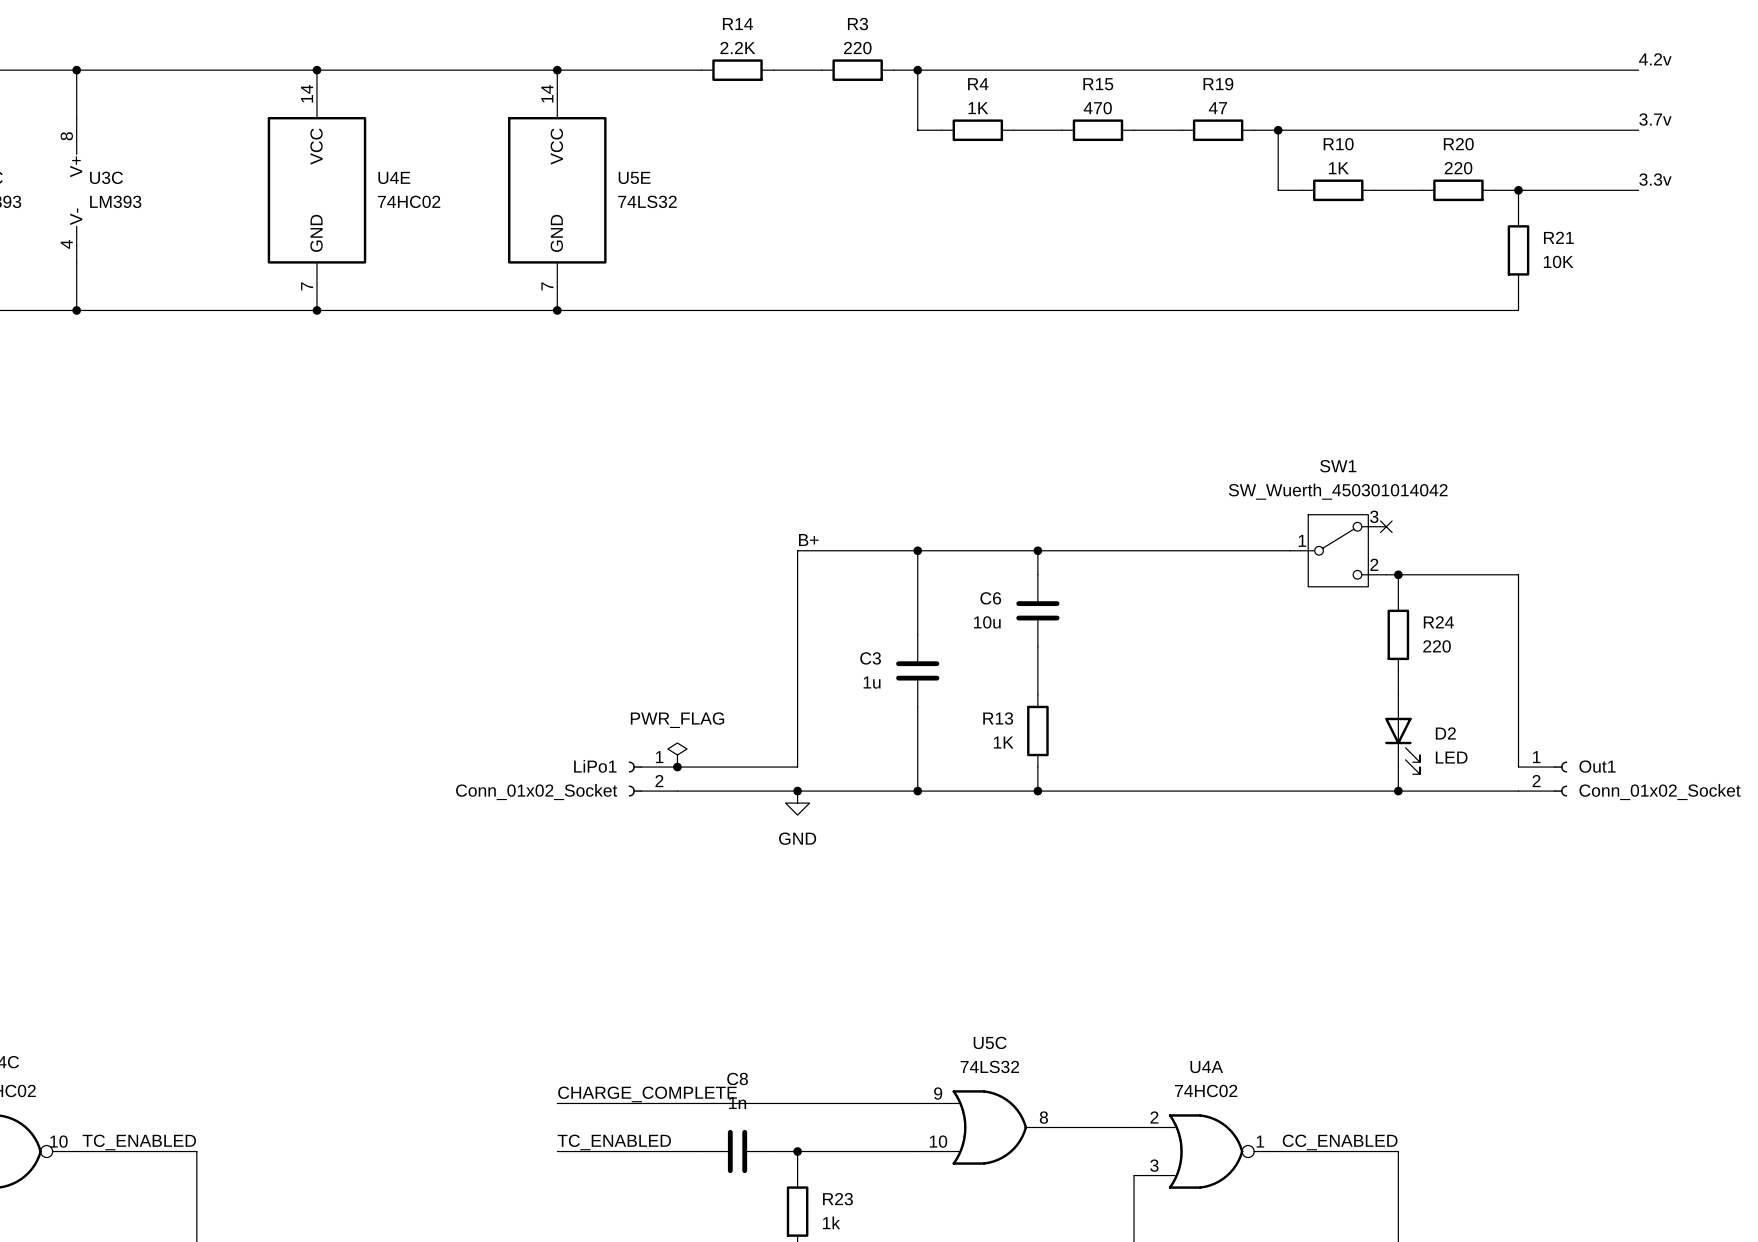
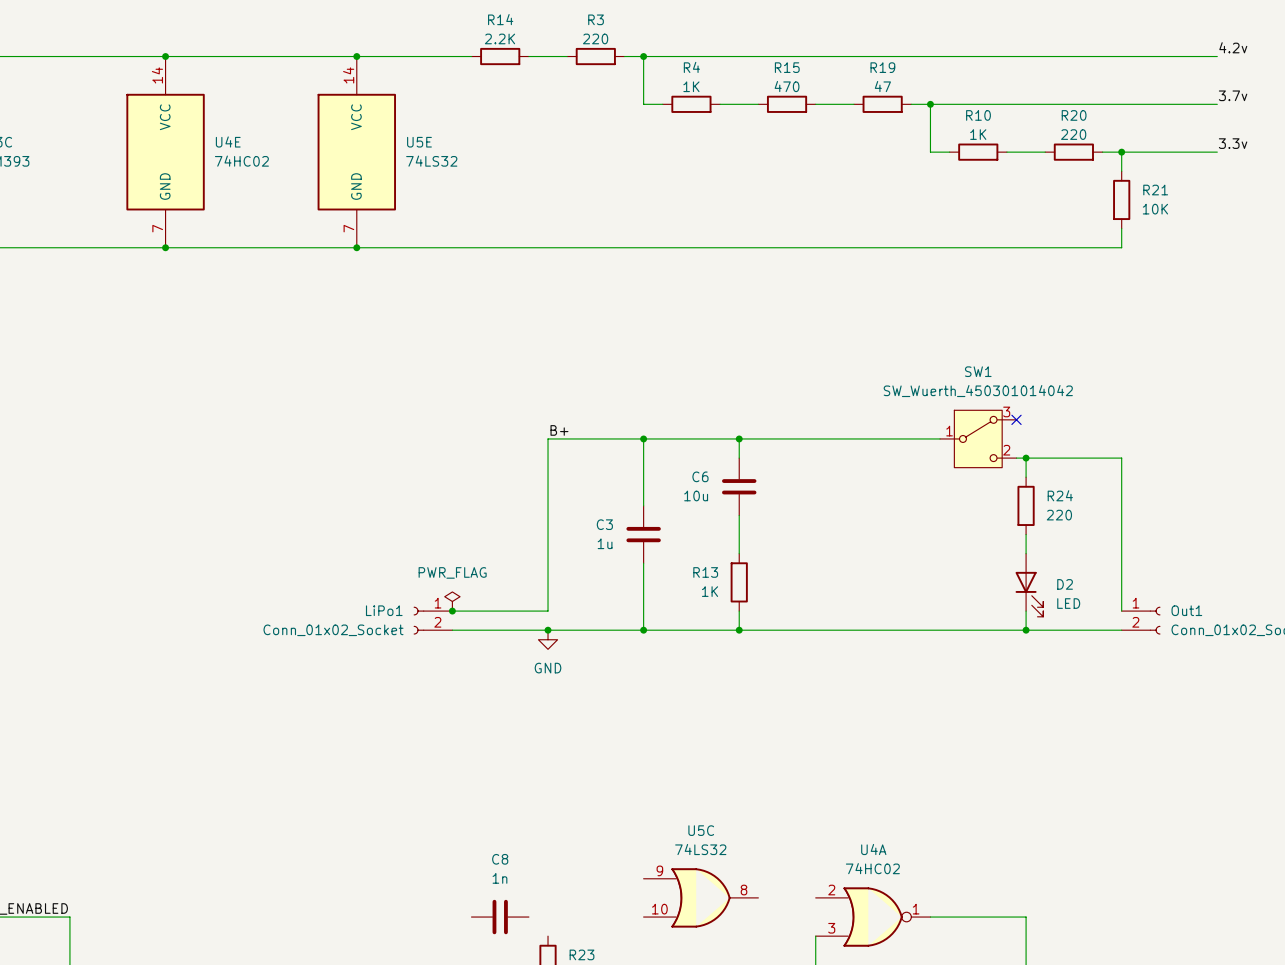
label: CHARGE_COMPLETE (647, 1094) -> none
wire: (557, 1103) (917, 1103) -> none
wire: (1061, 1127) (1134, 1127) -> none
label: TC_ENABLED (614, 1142) -> none
label: CC_ENABLED (1340, 1142) -> none
wire: (557, 1151) (701, 1151) -> none
wire: (773, 1151) (917, 1151) -> none
wire: (797, 1151) (797, 1175) -> none
junction: (797, 1151) -> none

